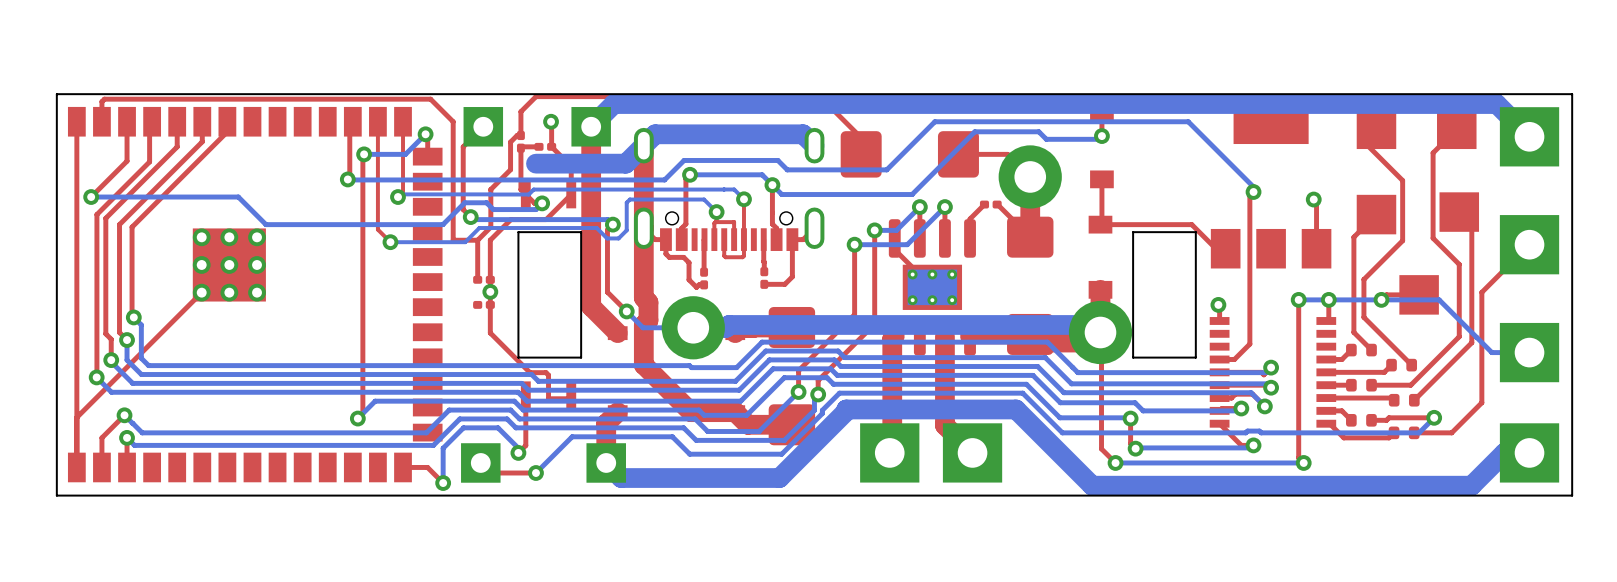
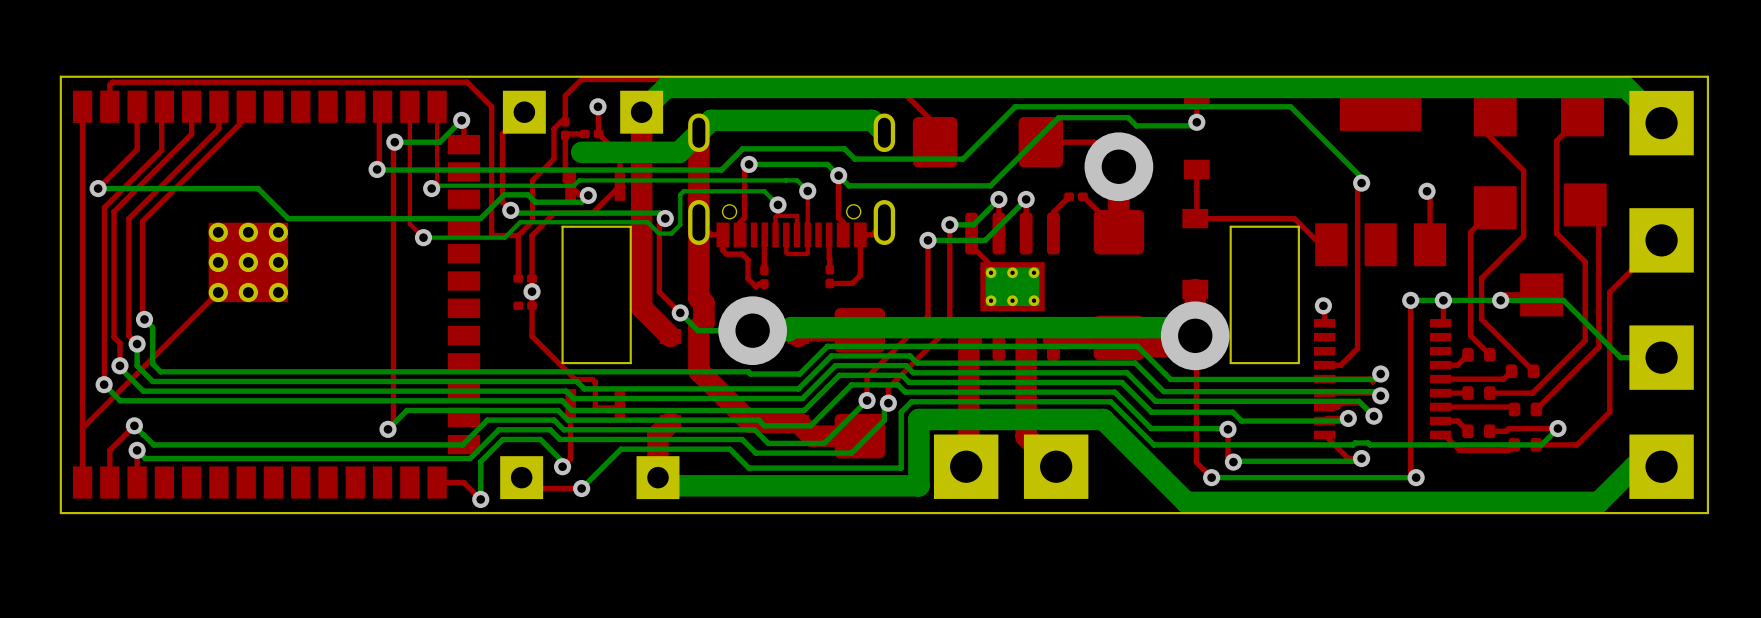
bottom track: (829, 402) (822, 410) (822, 413) (781, 454) -> (901, 412) (901, 468) (848, 468)
bottom track: (846, 411) (779, 478) (621, 478) (613, 470) -> (918, 421) (918, 485) (666, 485)

